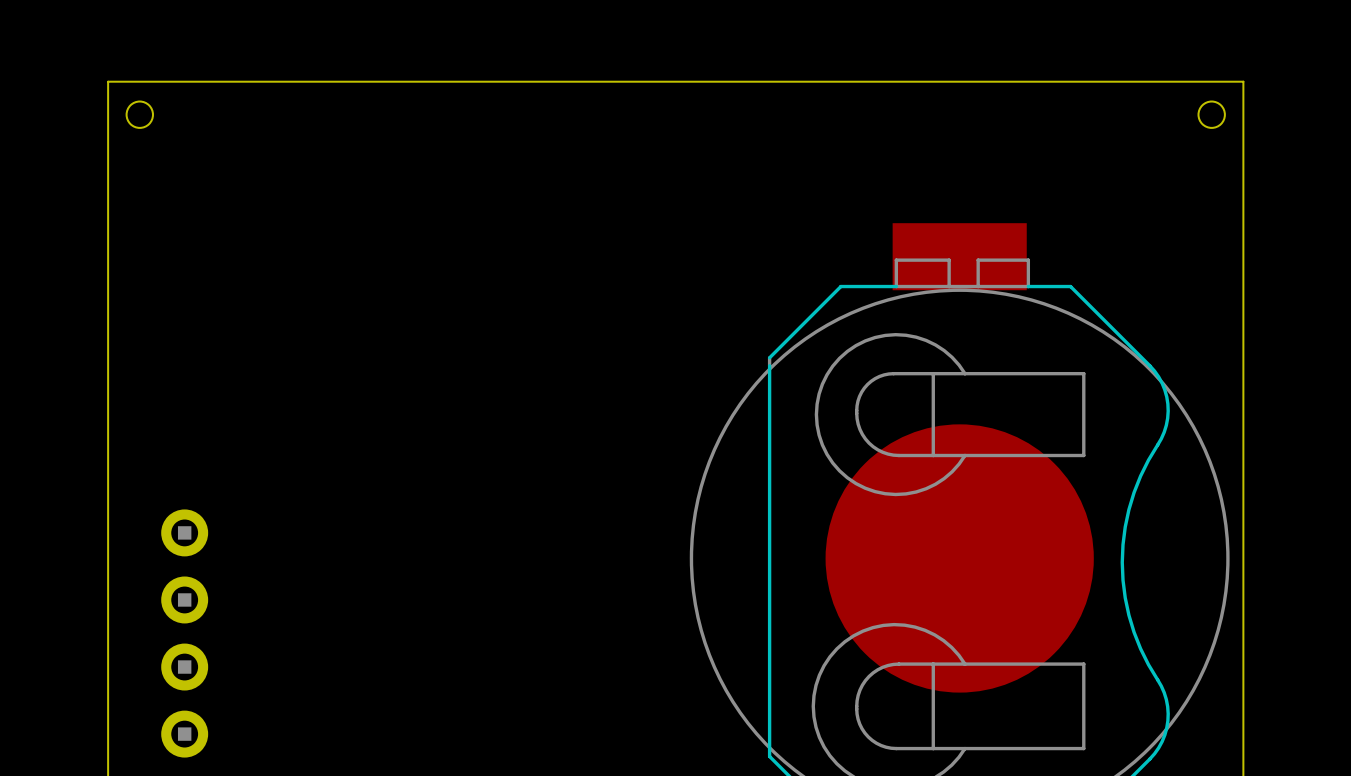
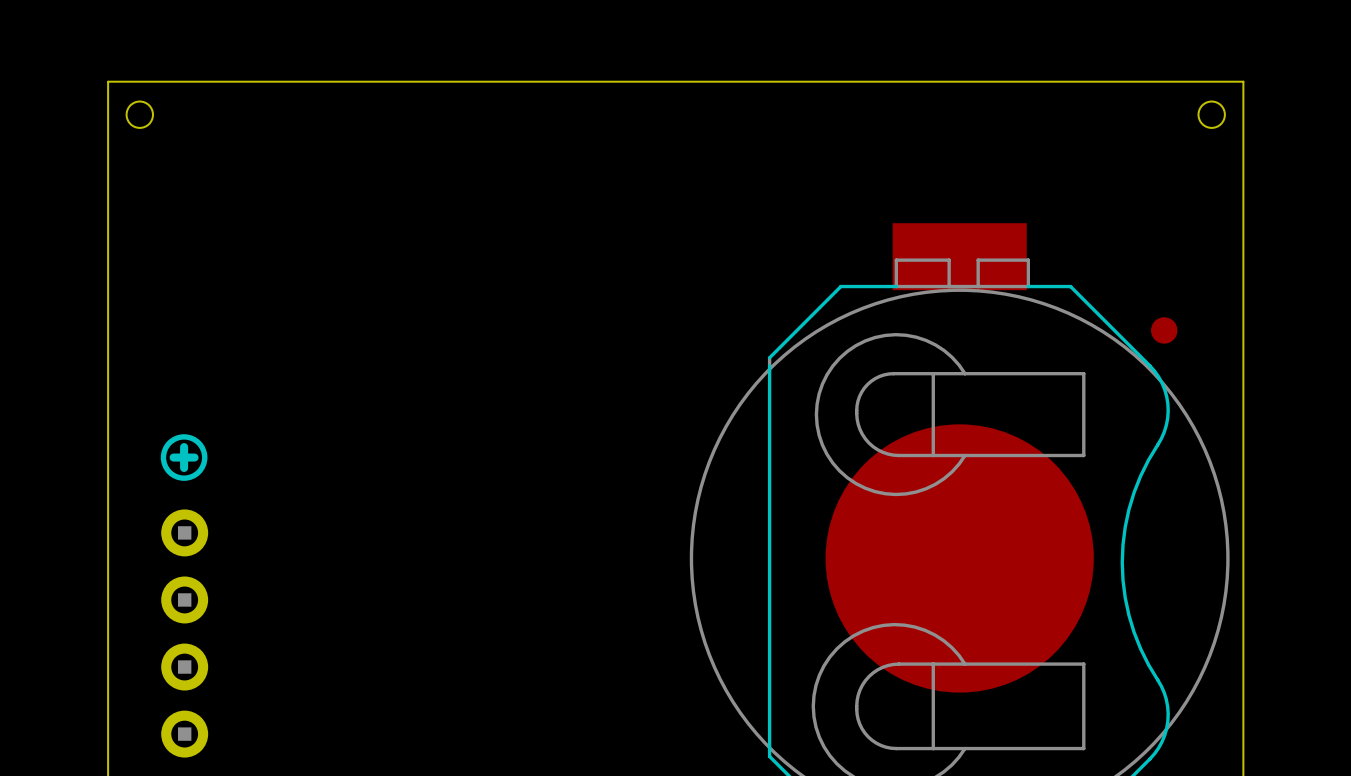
part: none -> (1164, 330)
drawing: none -> [160, 434, 208, 481]

